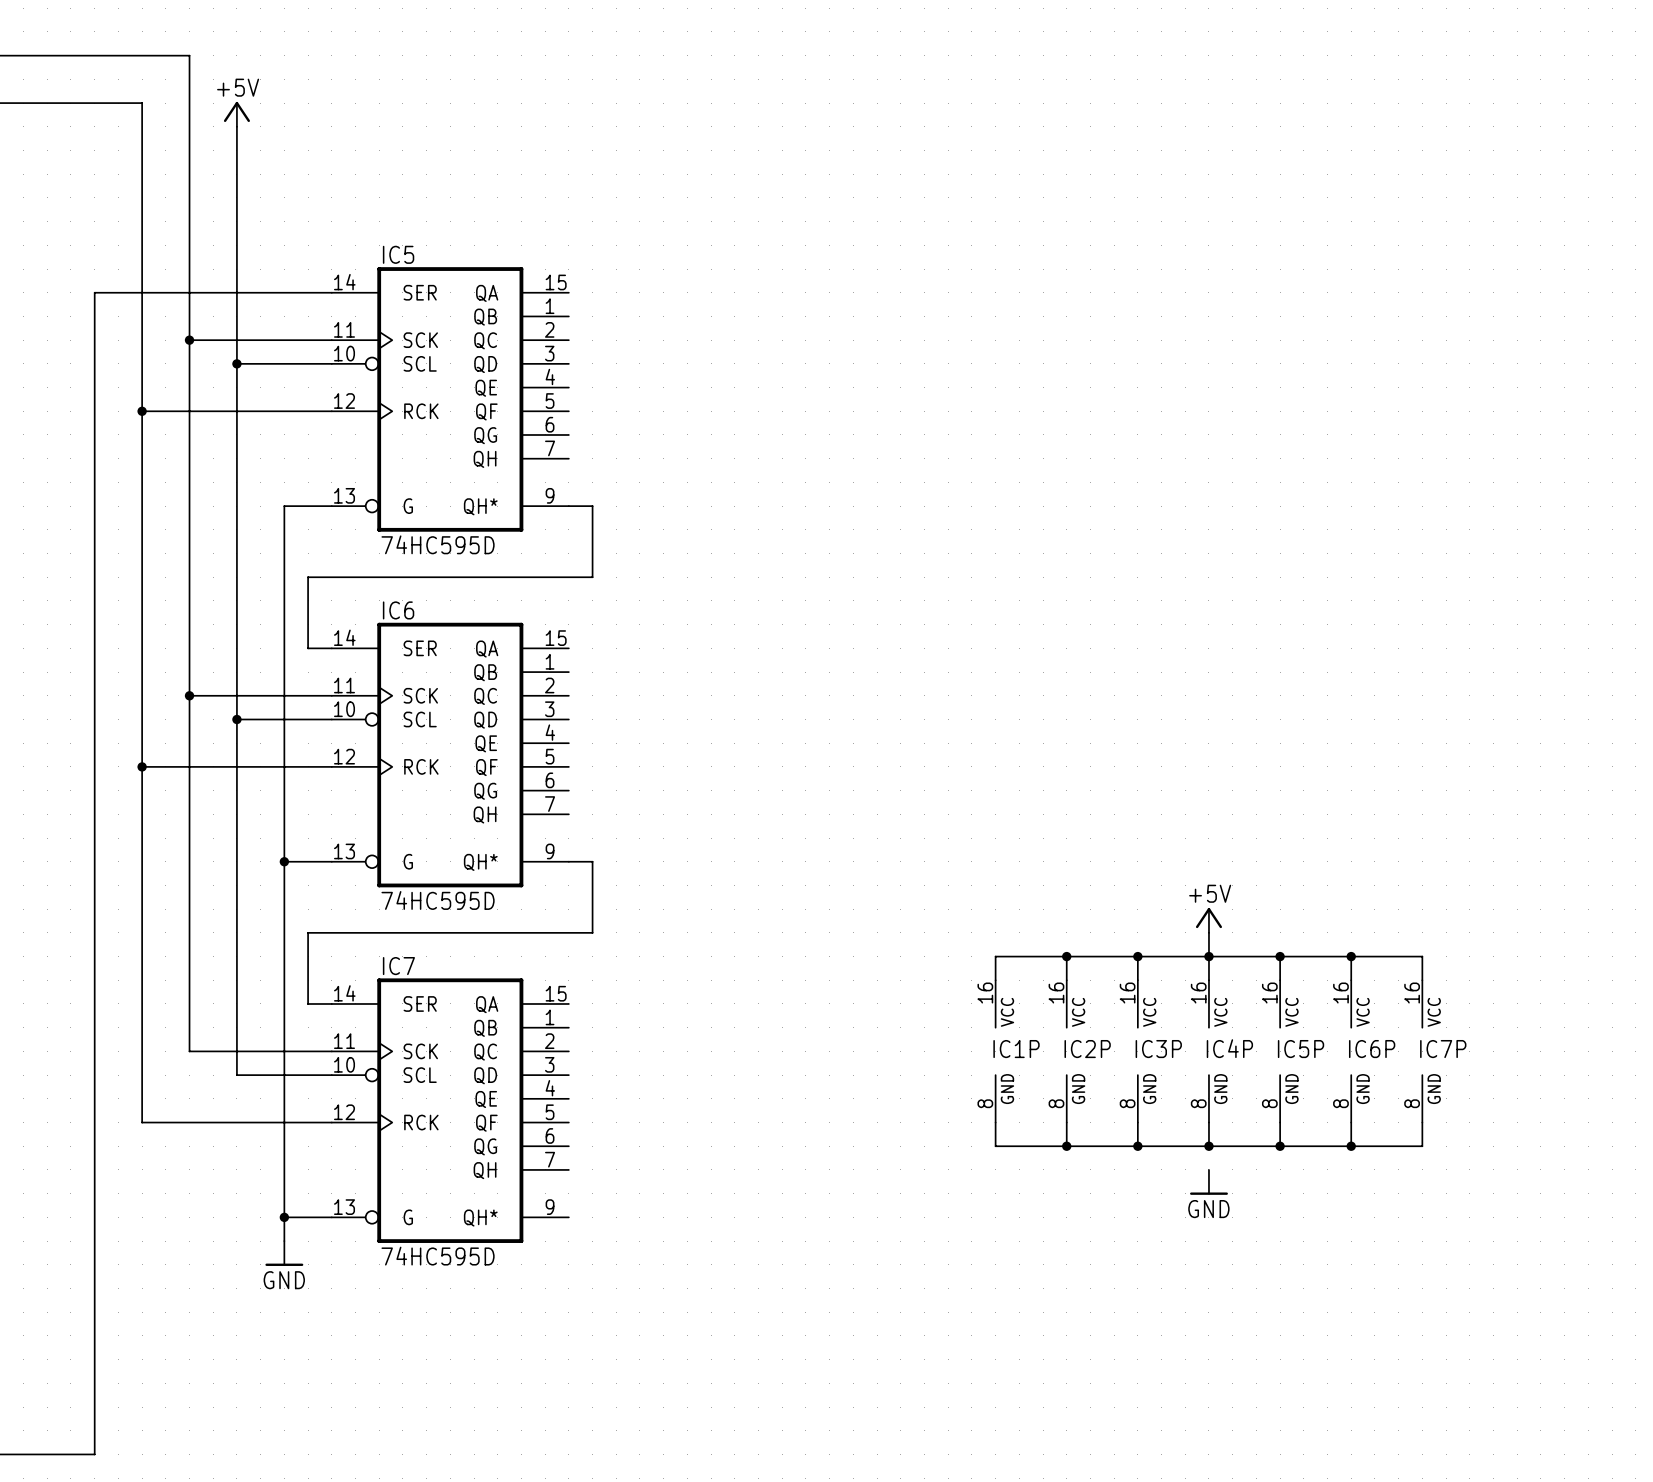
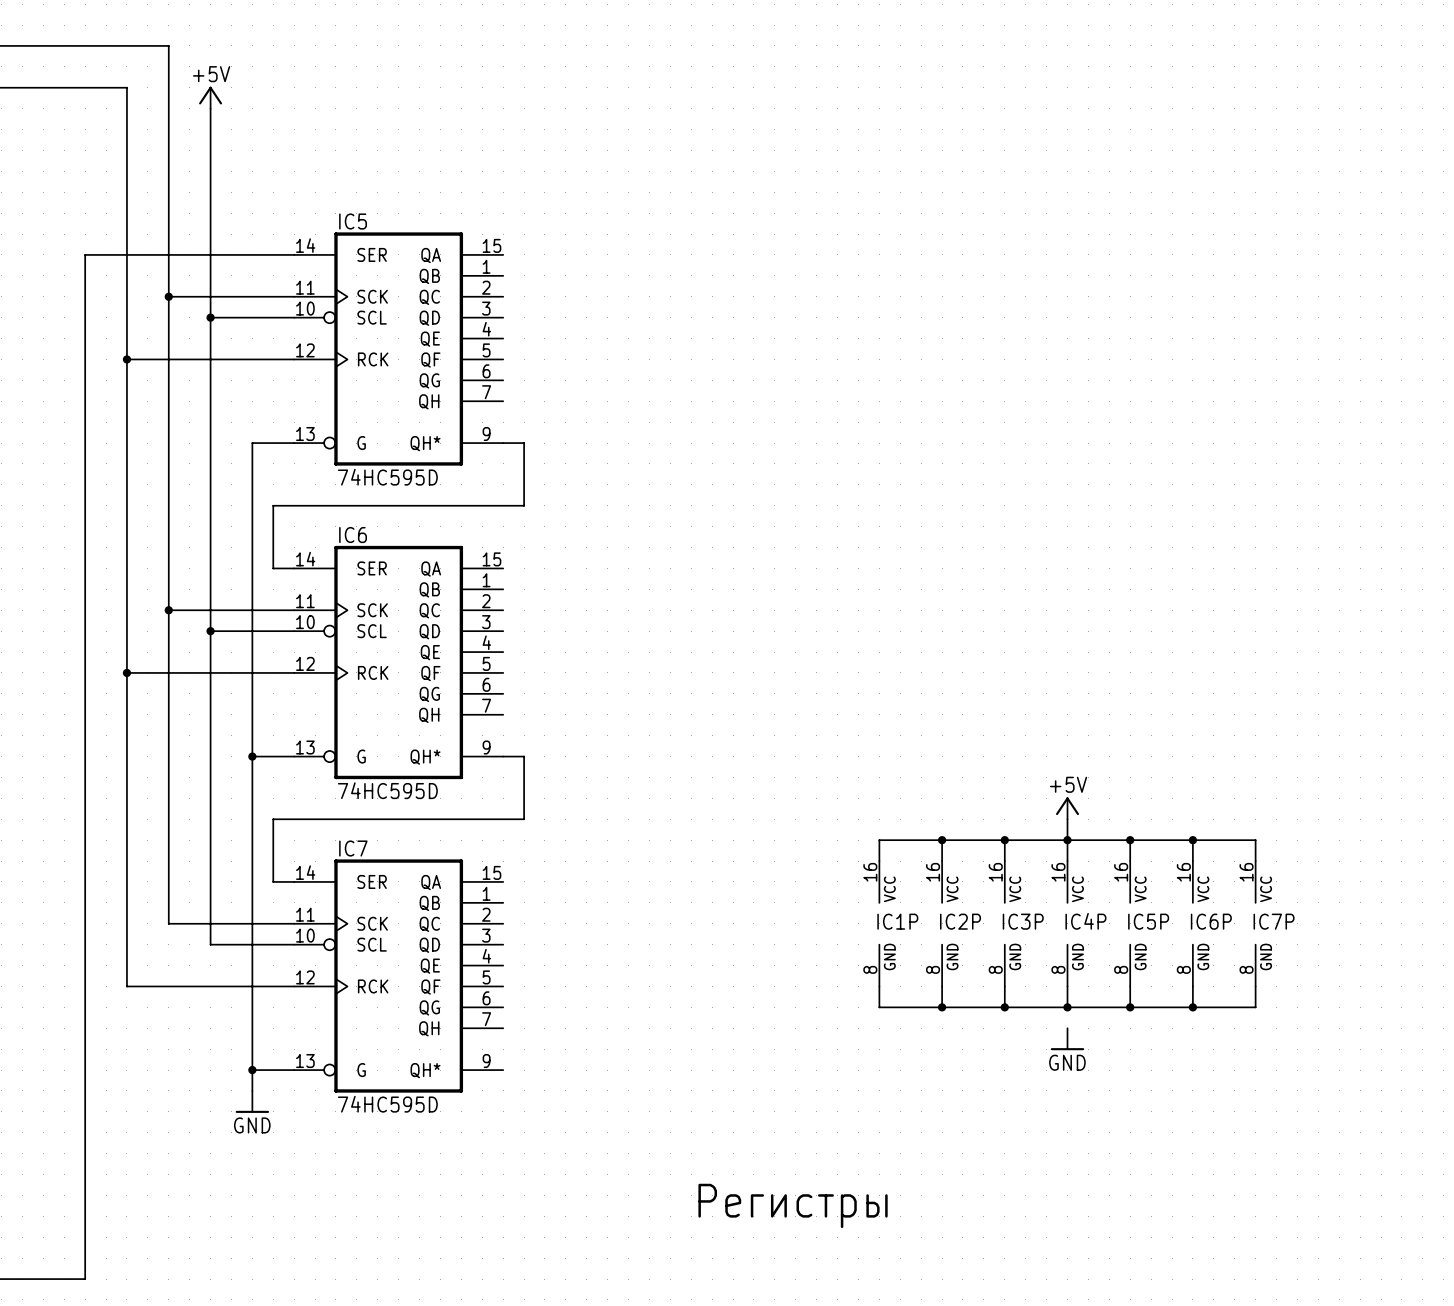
text: none -> Регистры (793, 1205)

